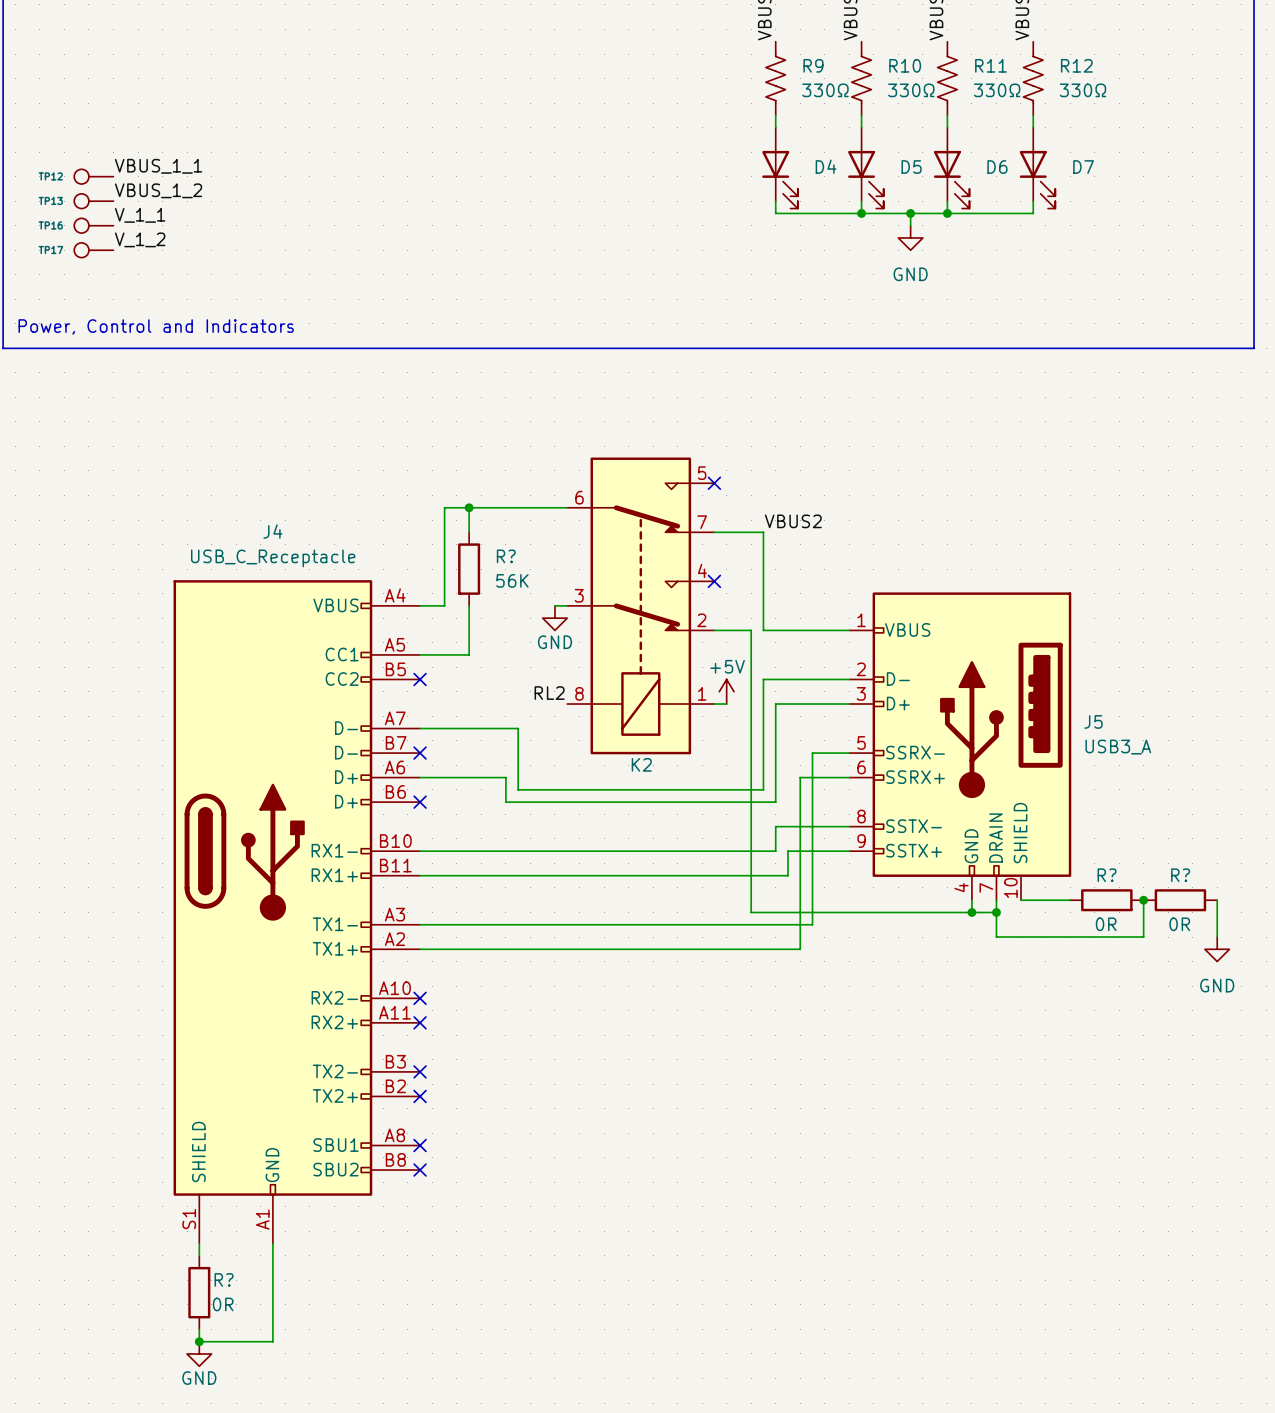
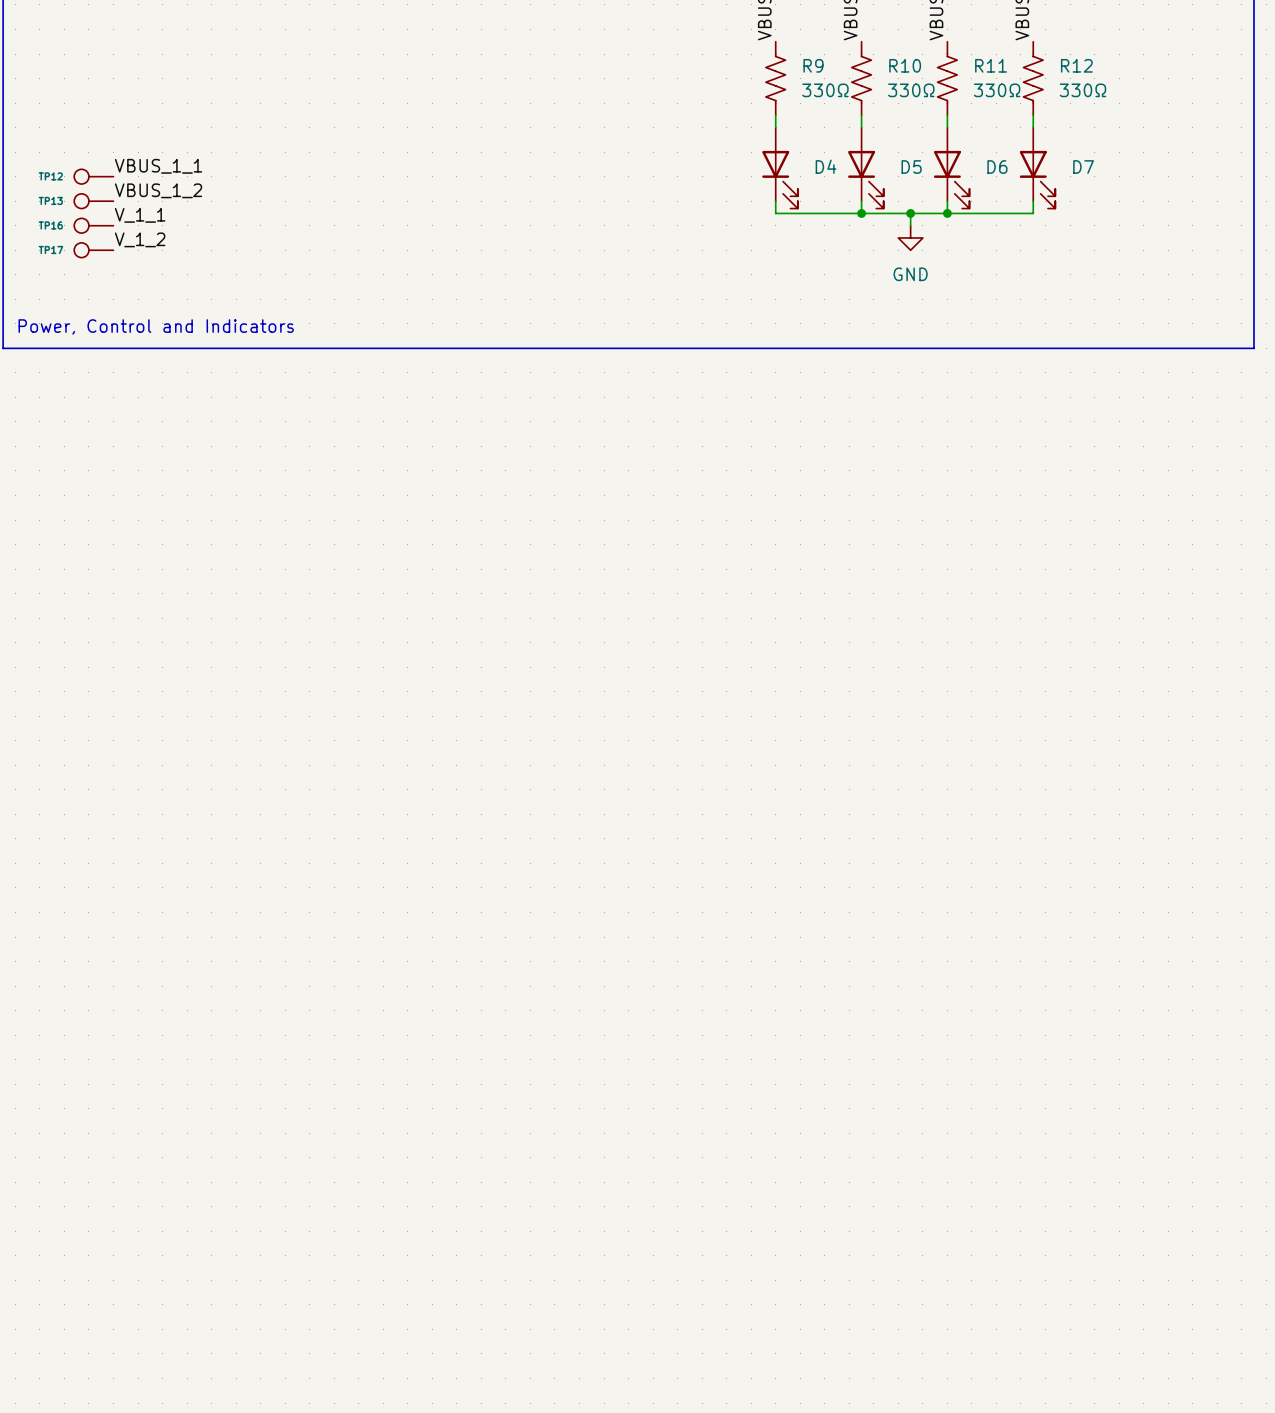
no-connect mark: (714, 483) -> none
wire: (469, 507) (469, 532) -> none
junction: (469, 507) -> none
wire: (567, 507) (444, 507) (444, 605) (420, 605) -> none
label: VBUS2 (793, 521) -> none
wire: (714, 532) (763, 532) (763, 630) (849, 630) -> none
R?: 56K (469, 569) -> none
no-connect mark: (714, 581) -> none
wire: (469, 605) (469, 654) (420, 654) -> none
wire: (554, 605) (567, 605) -> none
K2: (640, 605) -> none
power symbol: GND (554, 618) -> none
wire: (714, 630) (751, 630) (751, 912) (996, 912) -> none
no-connect mark: (420, 679) -> none
wire: (849, 679) (763, 679) (763, 789) (518, 789) (518, 728) (420, 728) -> none
power symbol: +5V (726, 691) -> none
label: RL2 (549, 693) -> none
wire: (714, 704) (726, 704) -> none
wire: (849, 704) (775, 704) (775, 802) (505, 802) (505, 777) (420, 777) -> none
J5: USB3_A (960, 746) -> none
no-connect mark: (420, 753) -> none
wire: (849, 753) (812, 753) (812, 924) (420, 924) -> none
wire: (849, 777) (800, 777) (800, 949) (420, 949) -> none
no-connect mark: (420, 802) -> none
wire: (849, 826) (775, 826) (775, 851) (420, 851) -> none
wire: (849, 851) (787, 851) (787, 875) (420, 875) -> none
wire: (971, 900) (971, 912) -> none
wire: (996, 900) (996, 937) (1143, 937) (1143, 900) -> none
wire: (1020, 900) (1070, 900) -> none
R?: 0R (1106, 900) -> none
junction: (1143, 900) -> none
R?: 0R (1180, 900) -> none
wire: (1217, 900) (1217, 937) -> none
J4: USB_C_Receptacle (296, 911) -> none
junction: (971, 912) -> none
junction: (996, 912) -> none
power symbol: GND (1217, 949) -> none
no-connect mark: (420, 998) -> none
no-connect mark: (420, 1022) -> none
no-connect mark: (420, 1071) -> none
no-connect mark: (420, 1096) -> none
no-connect mark: (420, 1145) -> none
no-connect mark: (420, 1170) -> none
wire: (199, 1243) (199, 1255) -> none
wire: (272, 1243) (272, 1341) (199, 1341) (199, 1329) -> none
R?: 0R (199, 1292) -> none
junction: (199, 1341) -> none
power symbol: GND (199, 1353) -> none

